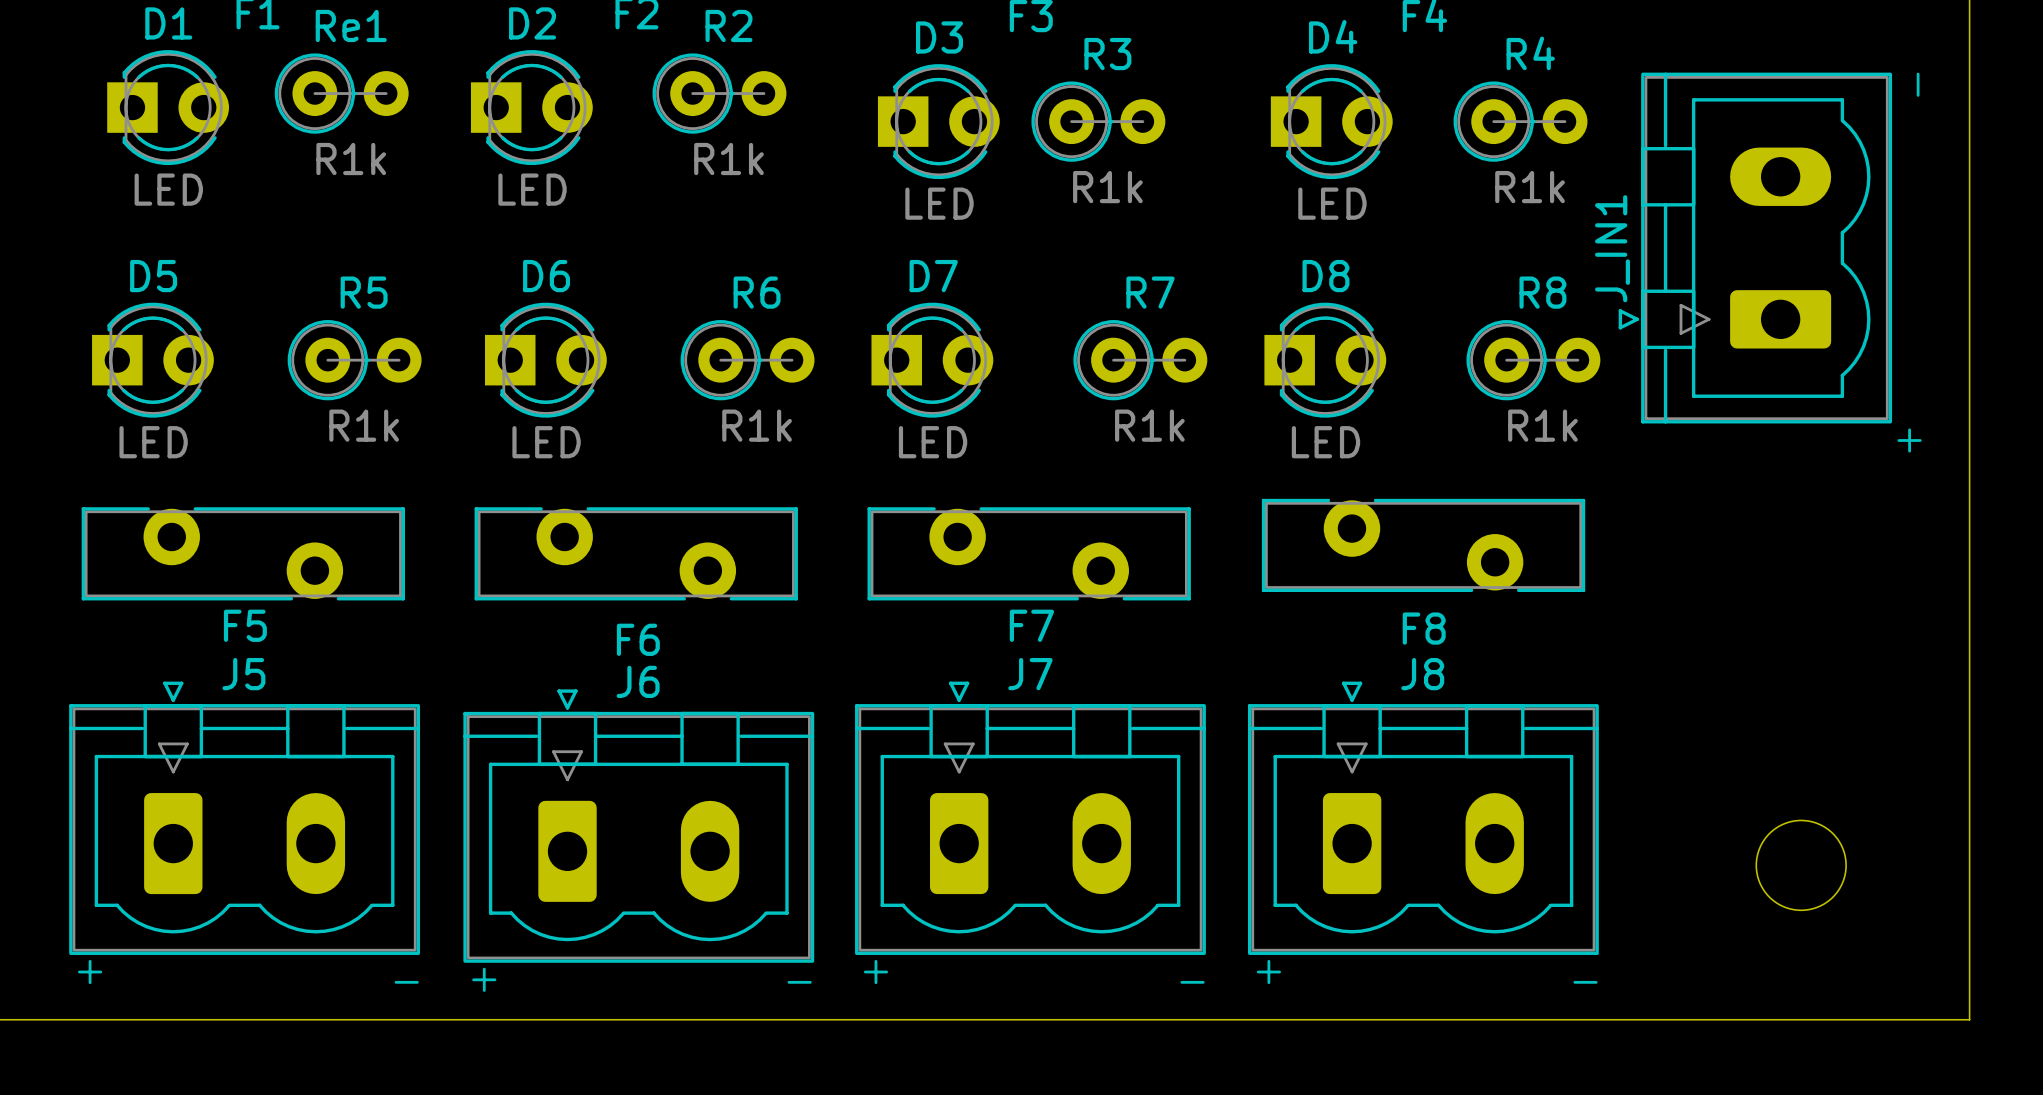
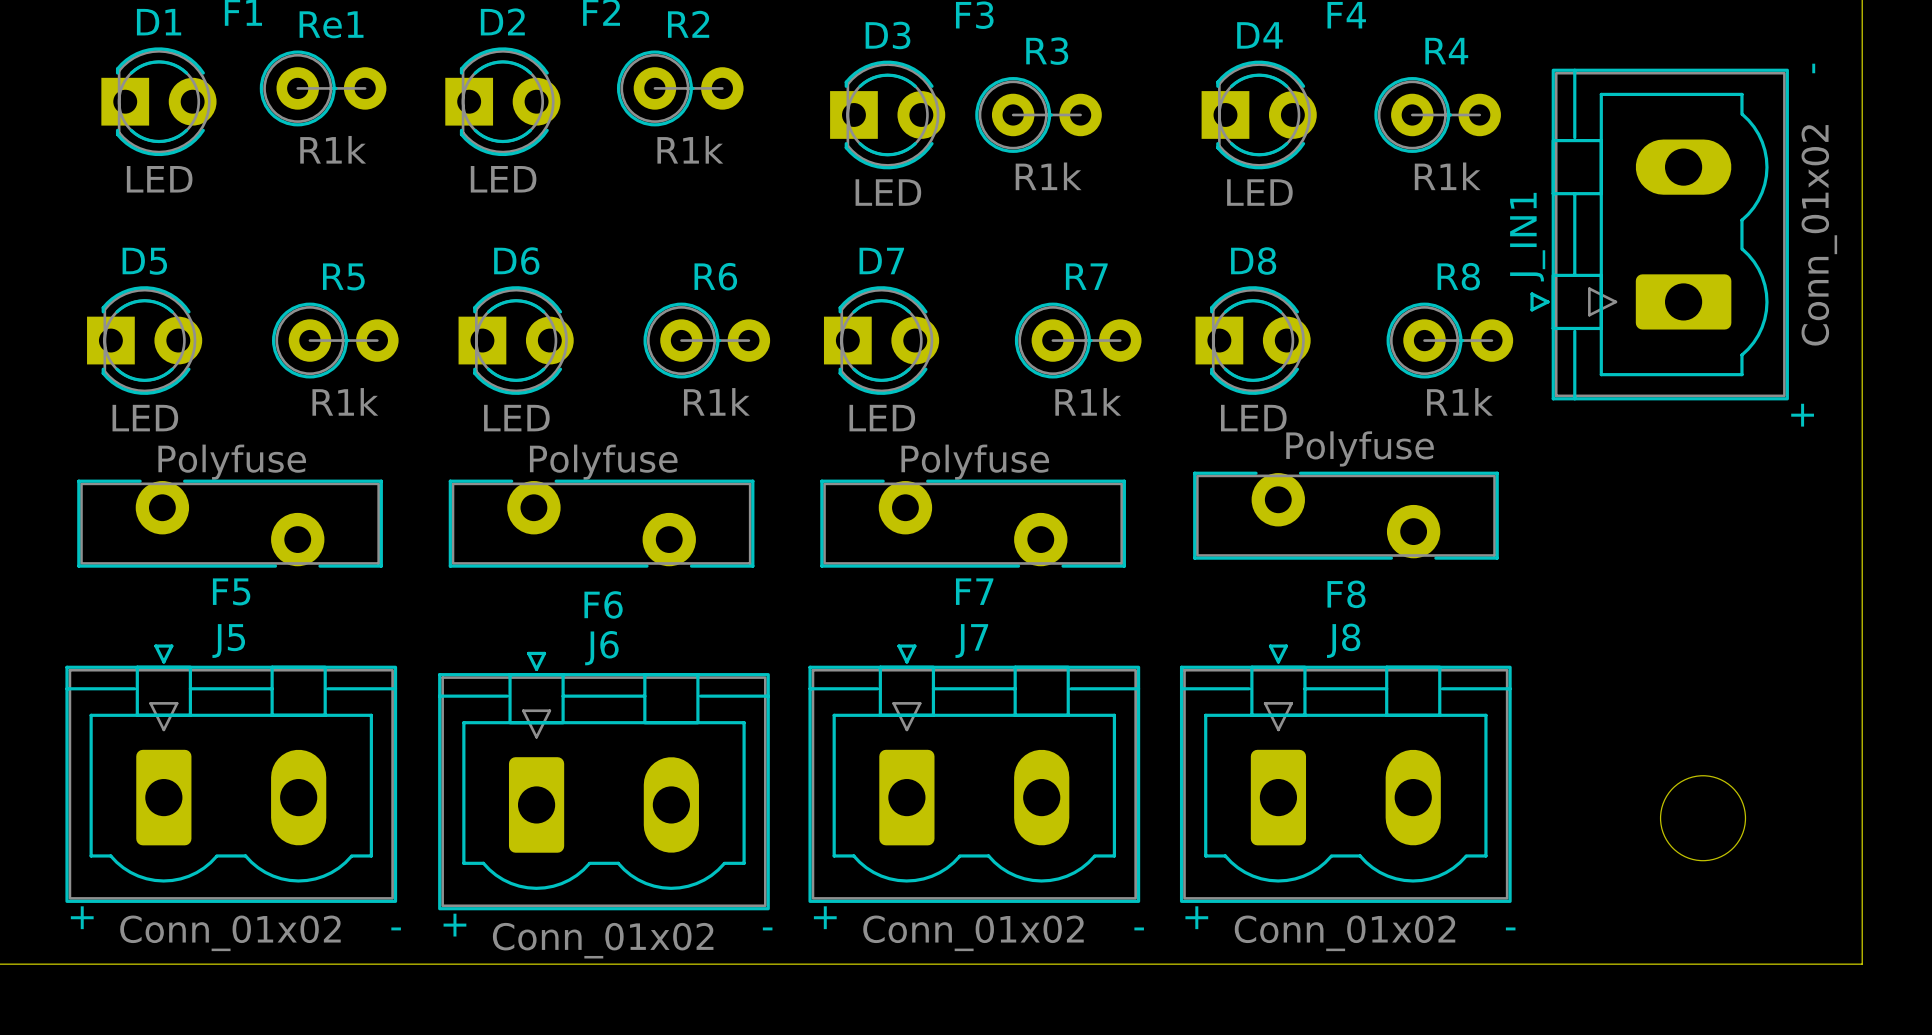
J_IN1 value: none -> Conn_01x02 (1819, 235)
F8 value: none -> Polyfuse (1360, 448)
F5 value: none -> Polyfuse (232, 462)
F6 value: none -> Polyfuse (603, 462)
F7 value: none -> Polyfuse (975, 462)
J5 value: none -> Conn_01x02 (230, 933)
J7 value: none -> Conn_01x02 (973, 933)
J8 value: none -> Conn_01x02 (1345, 933)
J6 value: none -> Conn_01x02 (603, 940)

